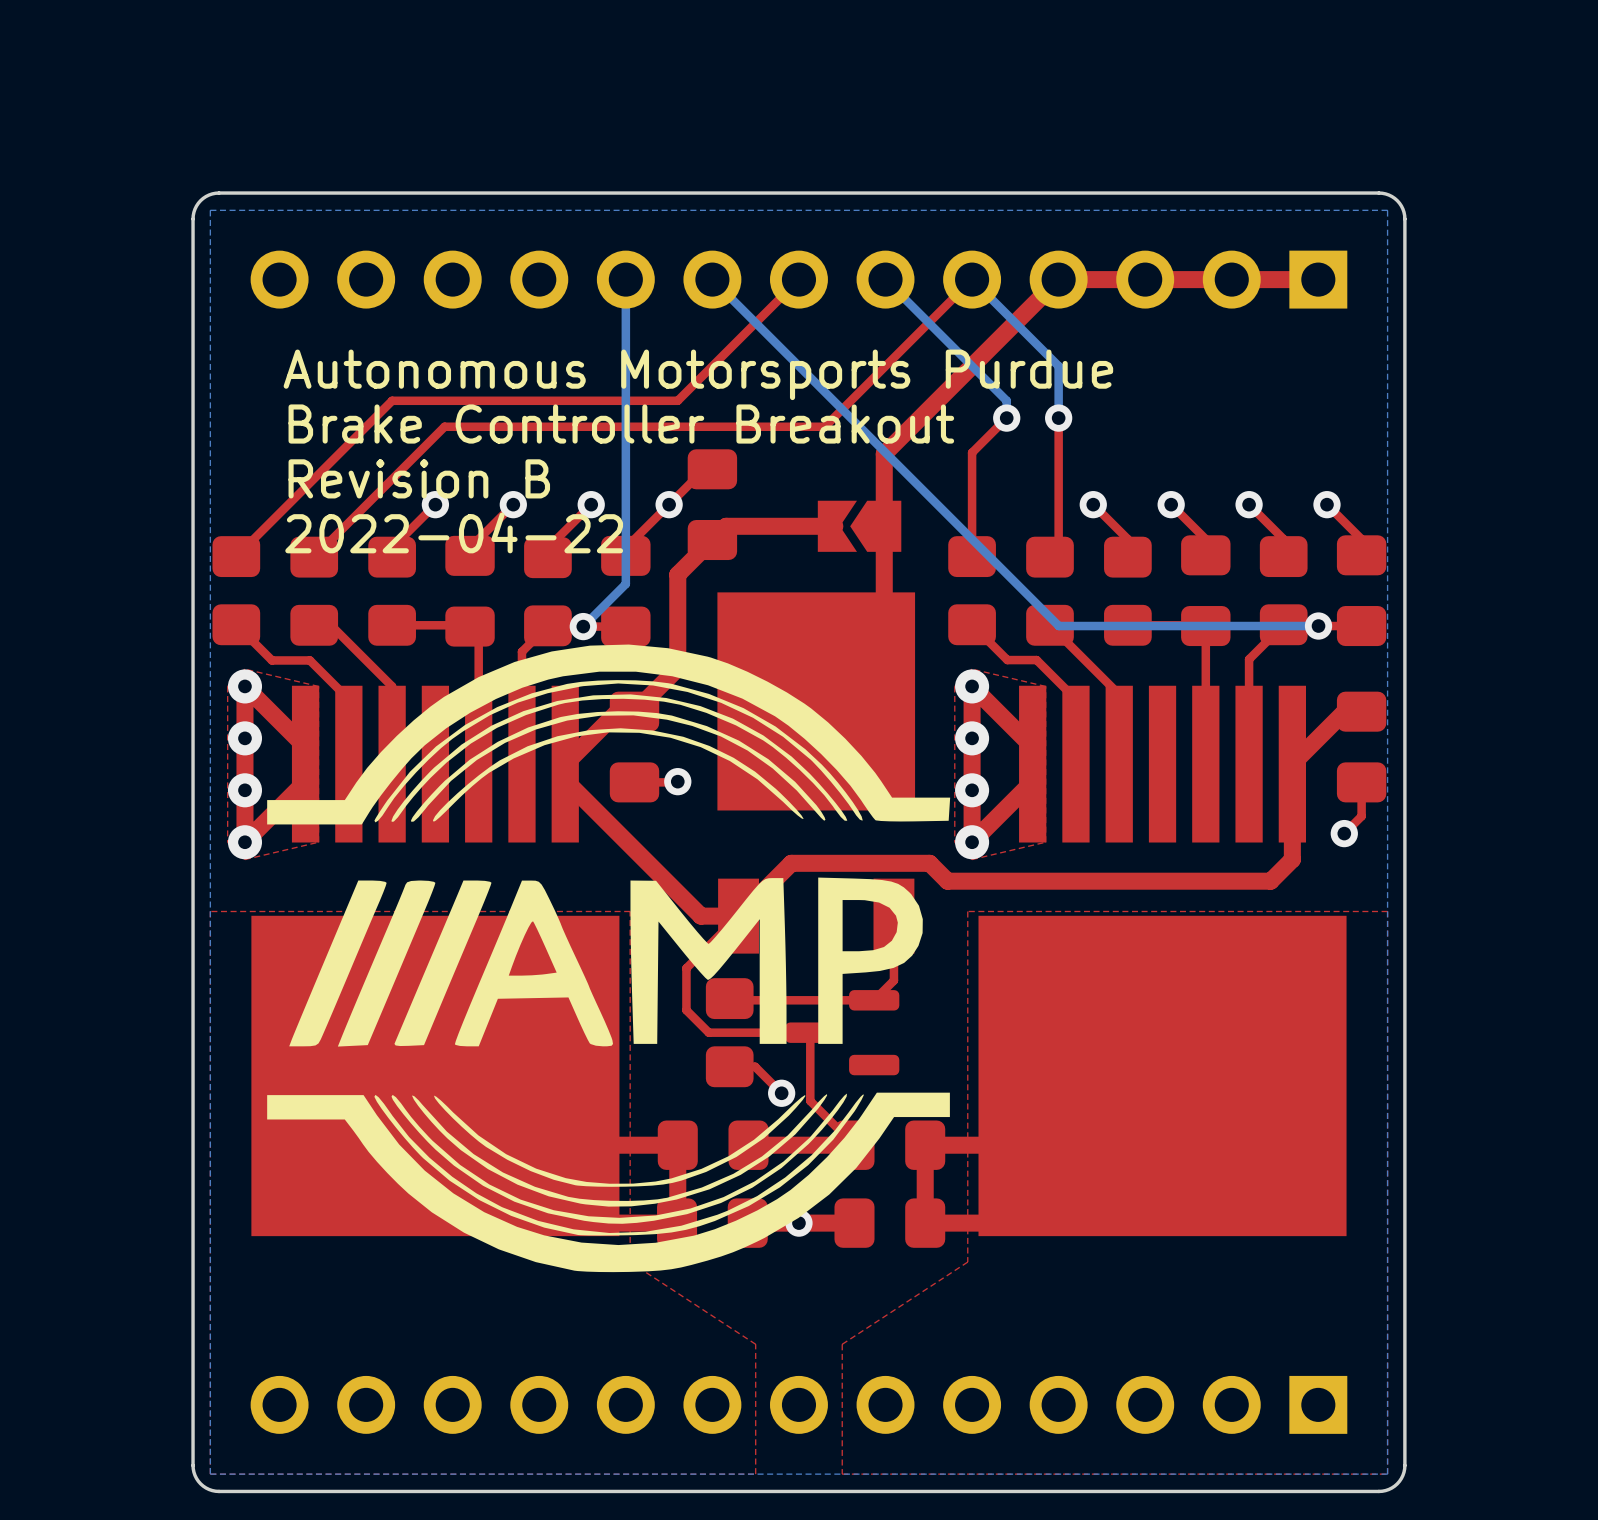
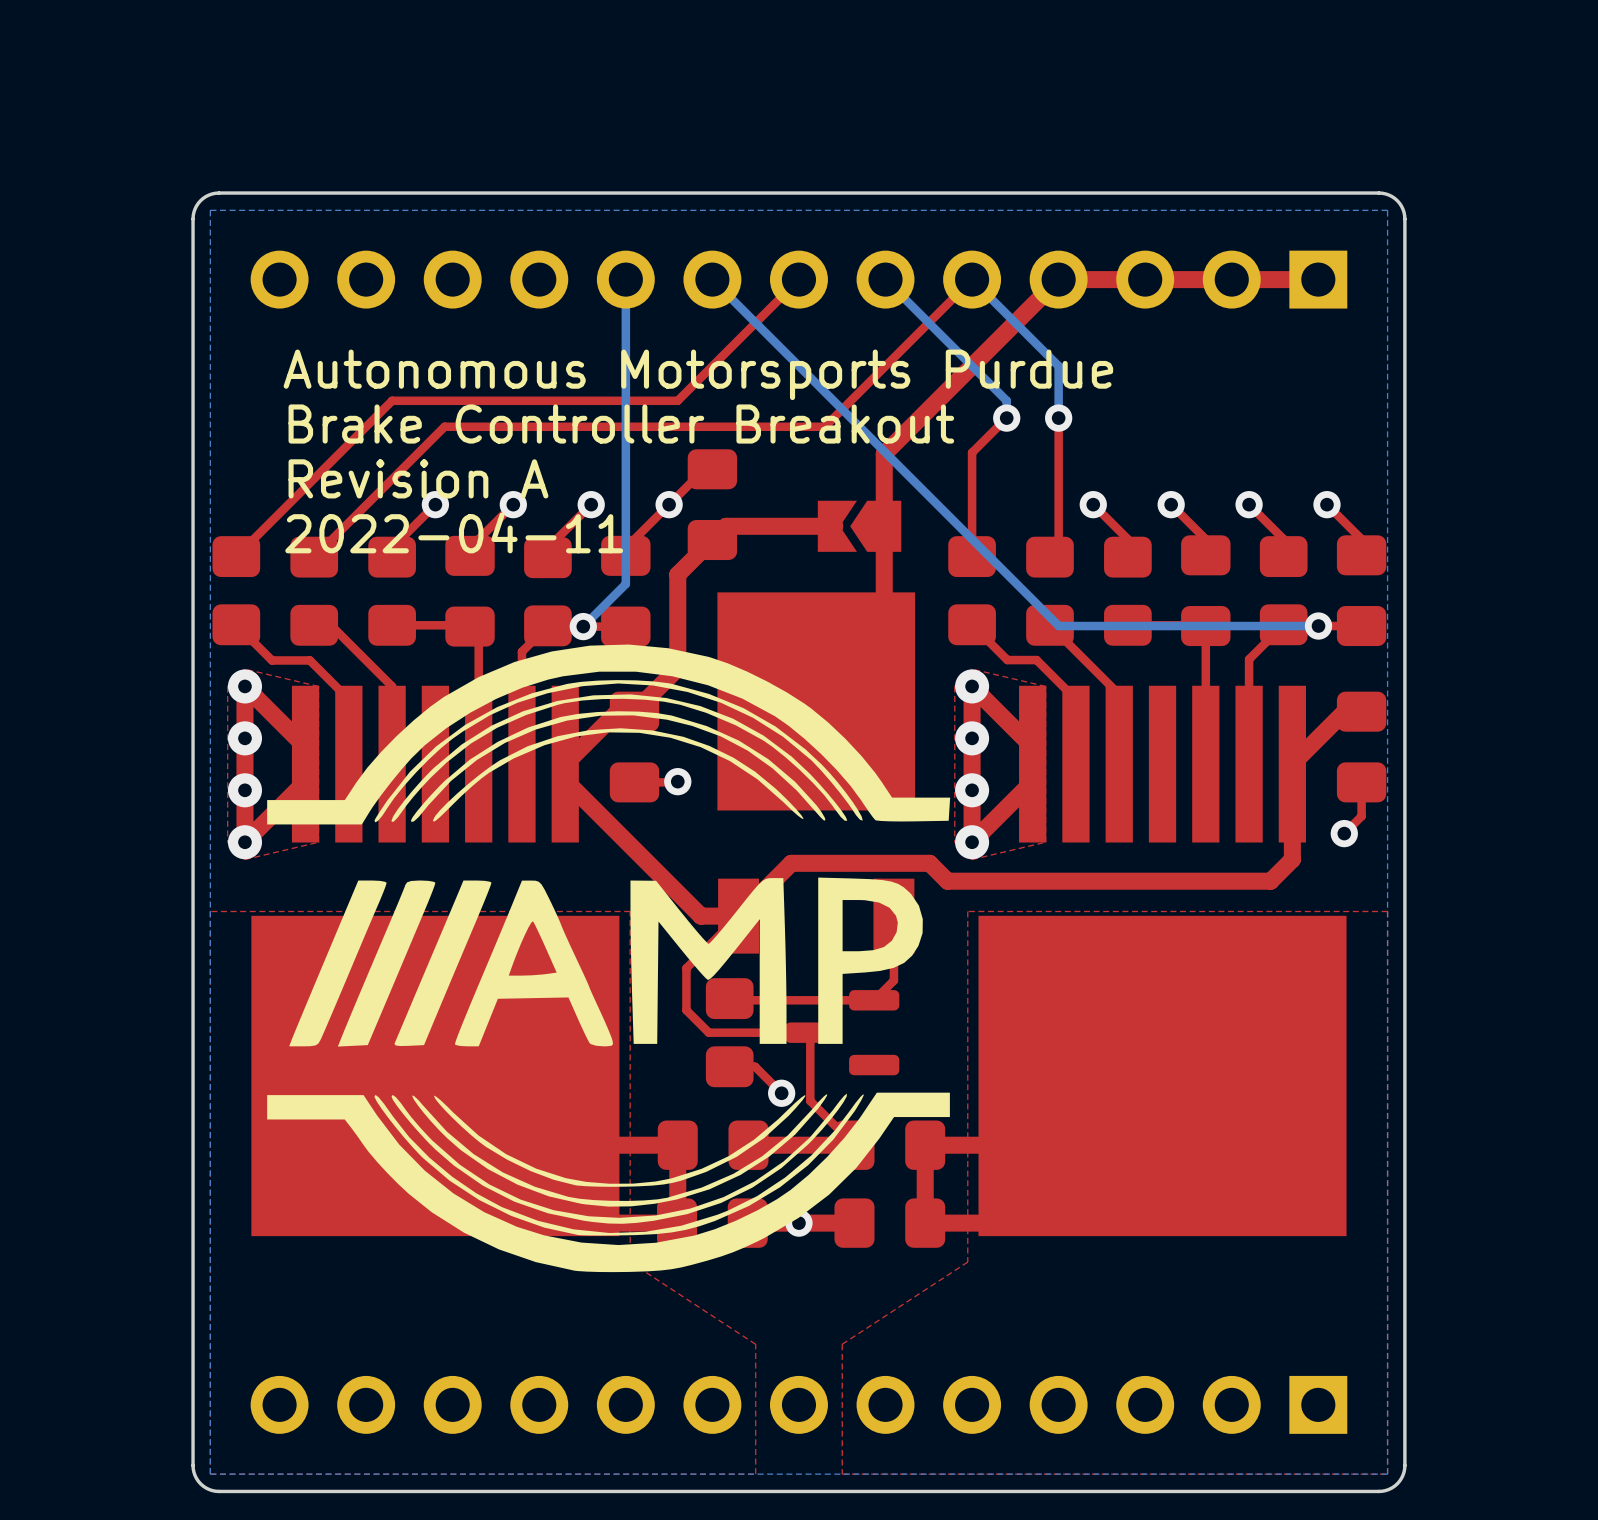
text: Revision B (419, 478) -> Revision A (418, 478)
text: 2022-04-22 (454, 532) -> 2022-04-11 (454, 532)

